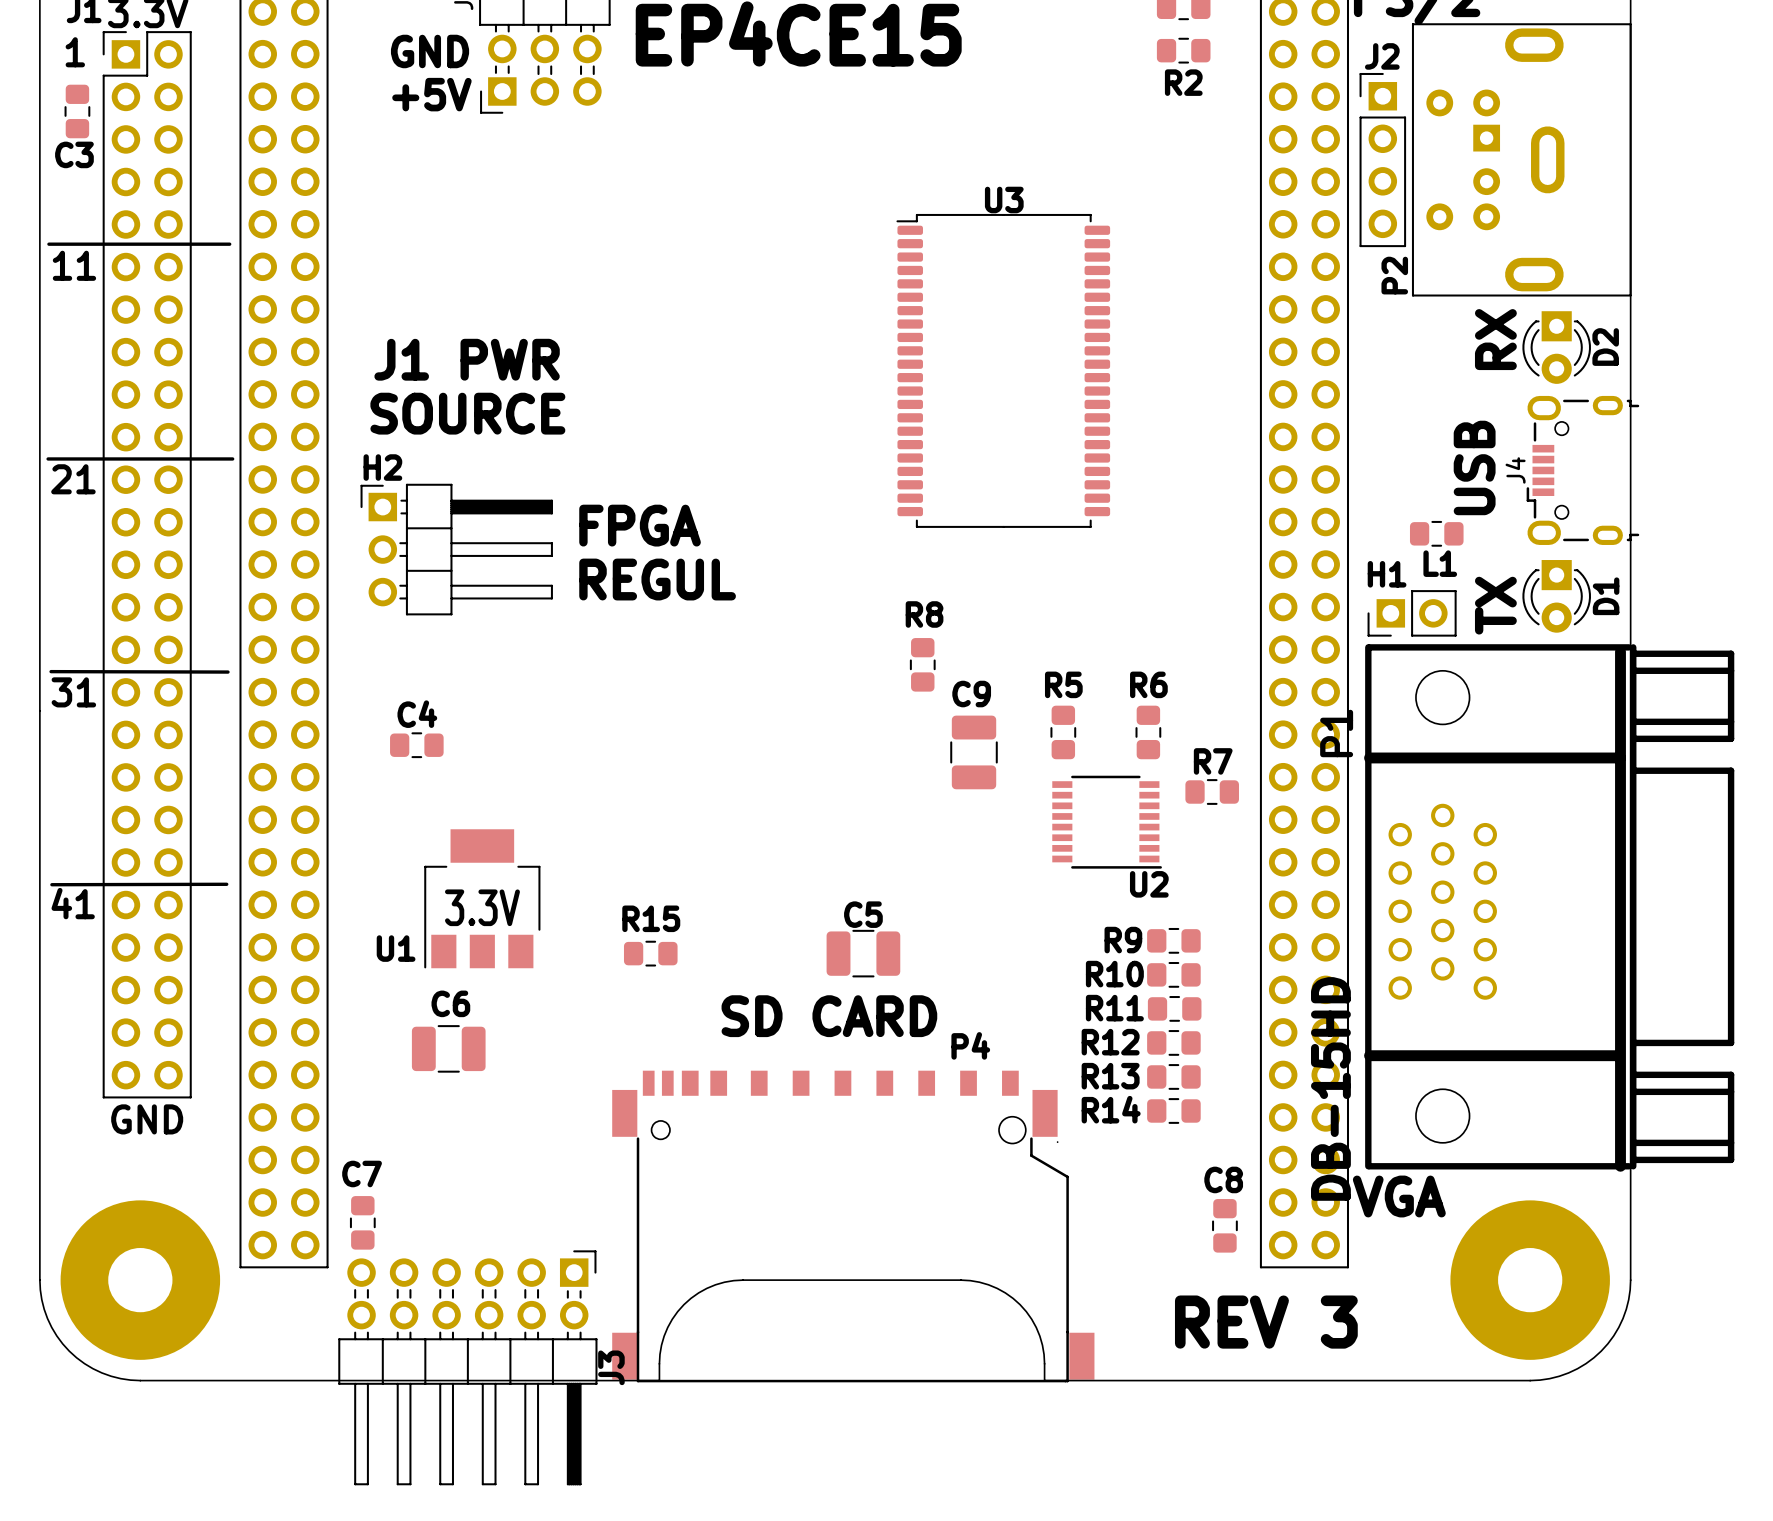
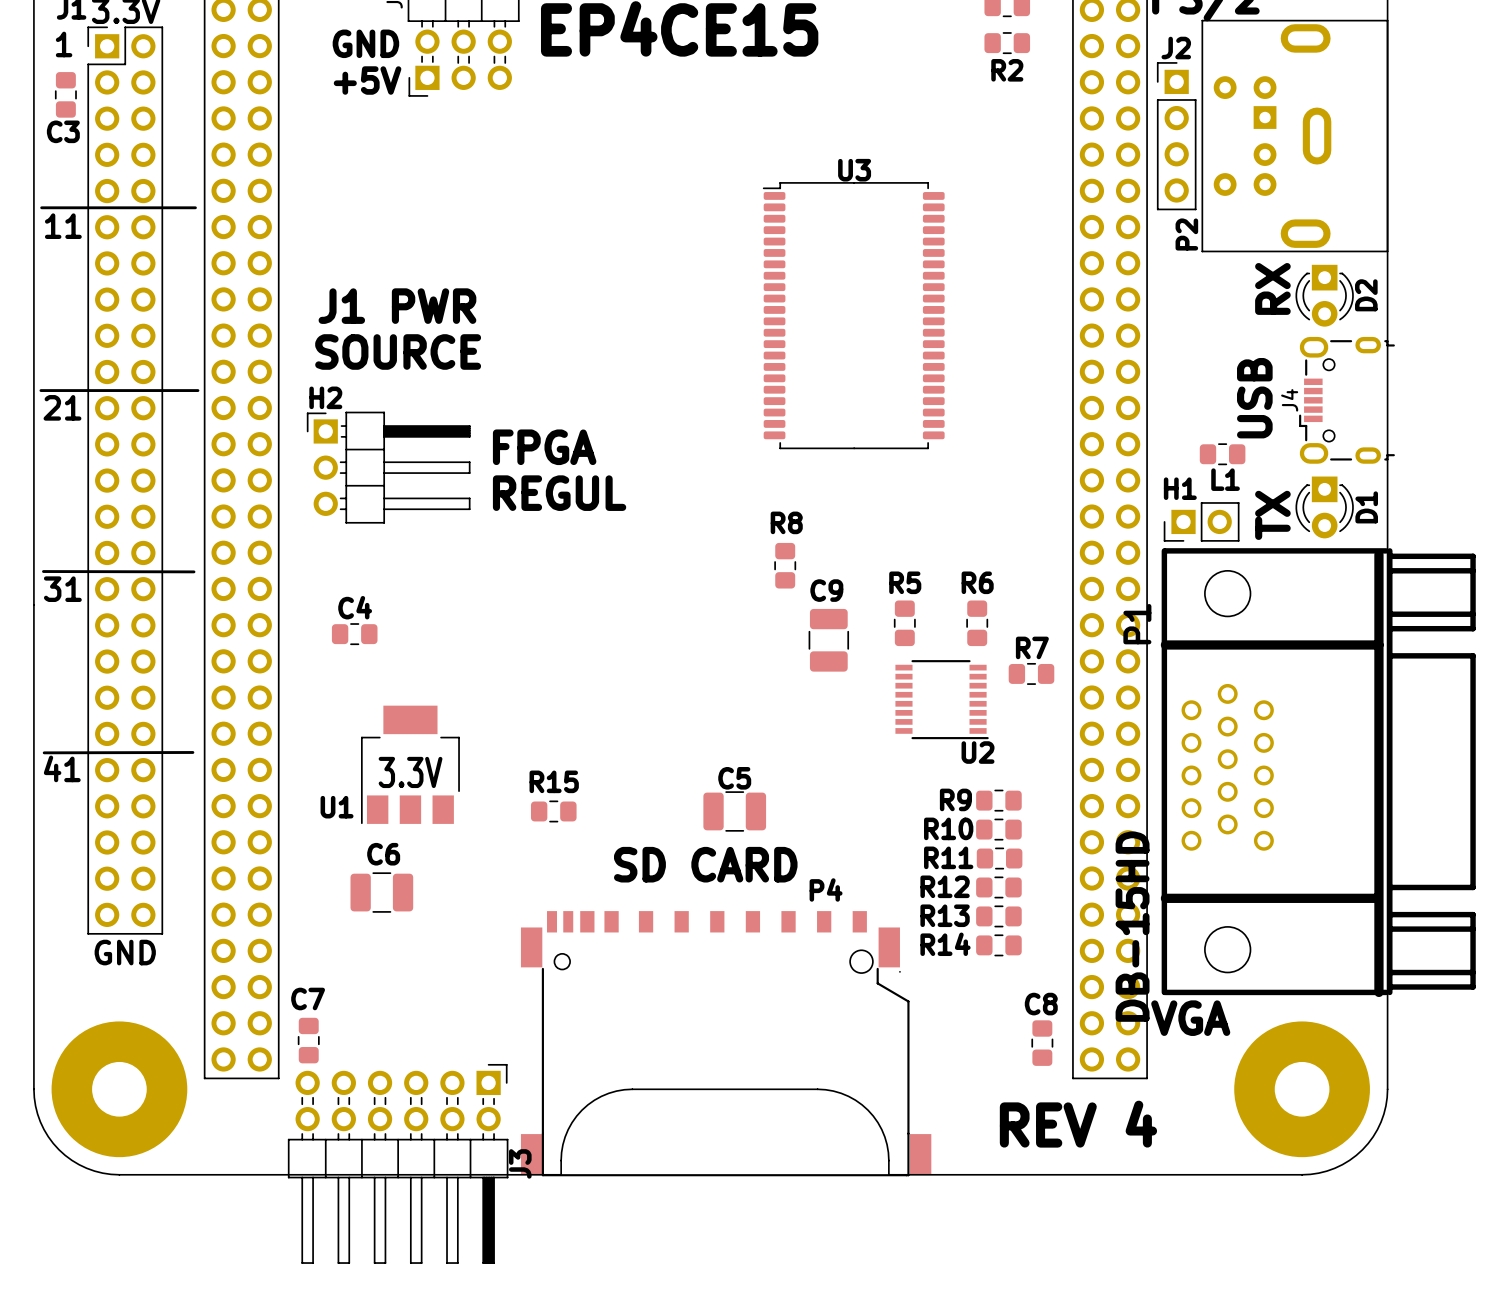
text: REV 3 (1266, 1322) -> REV 4 (1078, 1124)

